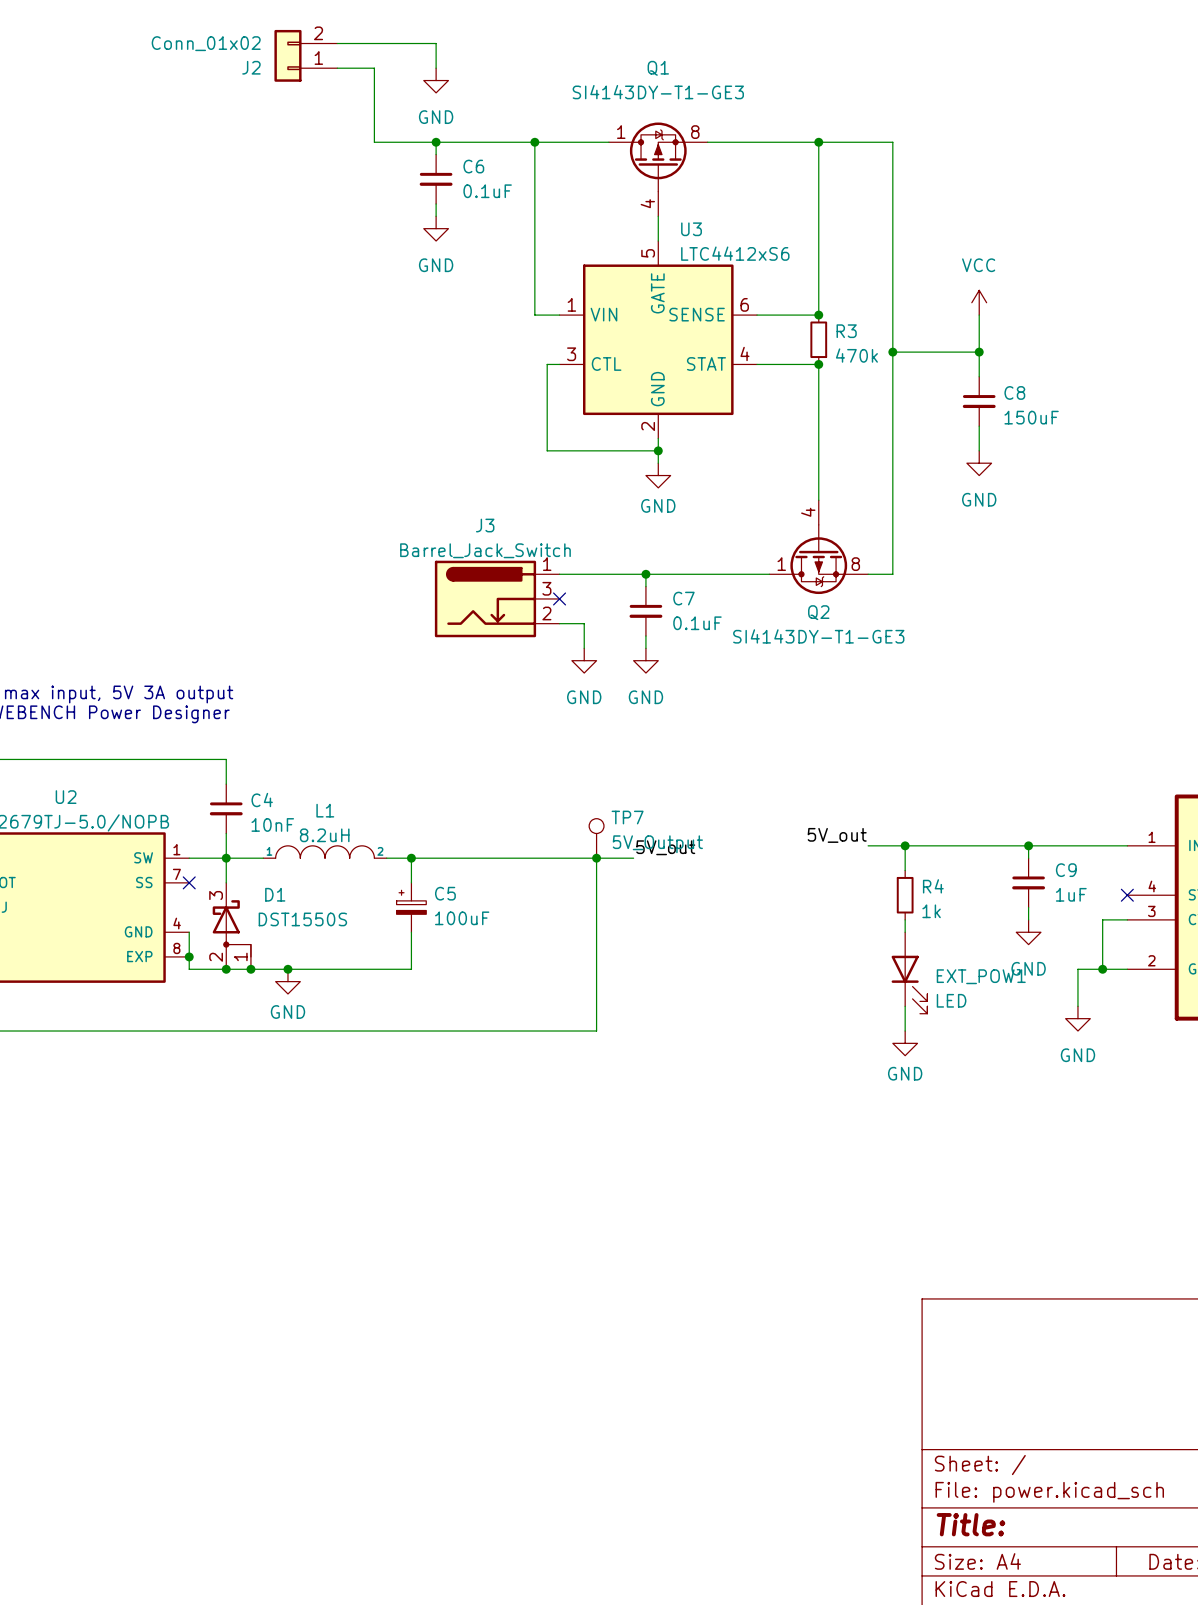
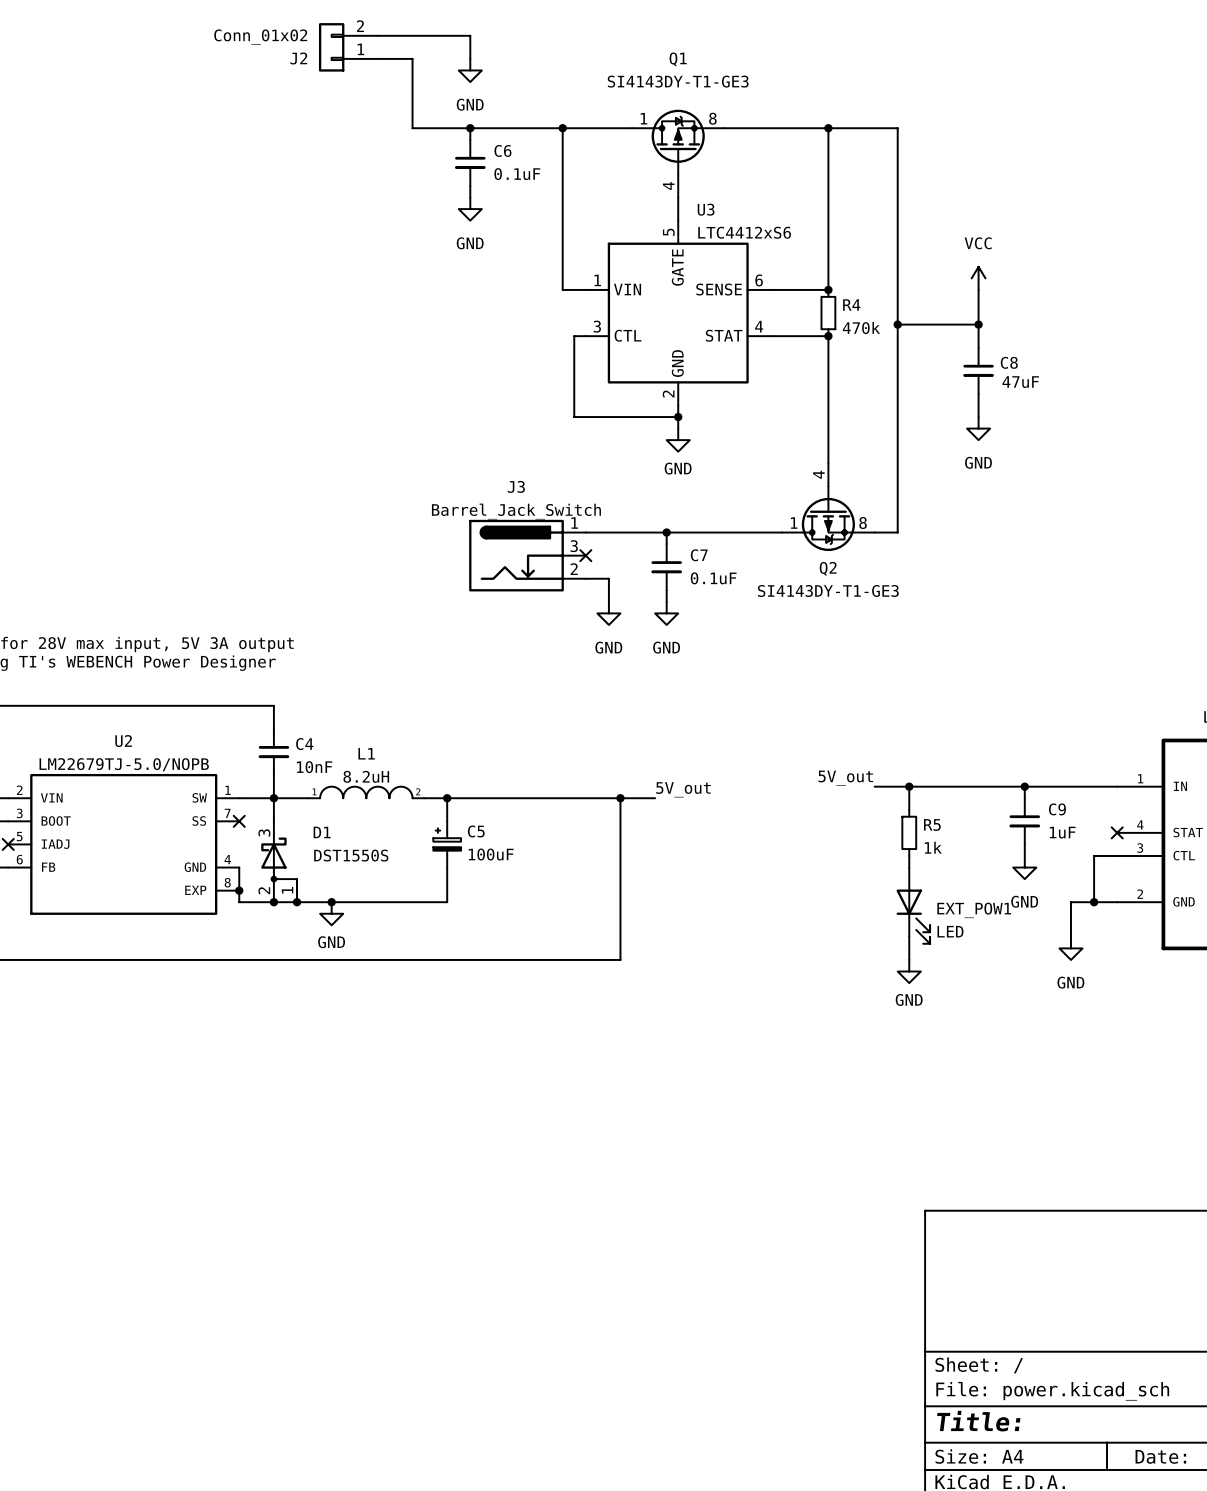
R3 name: R3 (846, 331) -> R4 (851, 305)
C8 value: 150uF (1031, 417) -> 47uF (1020, 382)
TP7: 5V_Output (596, 838) -> none
R4 name: R4 (933, 886) -> R5 (932, 824)

